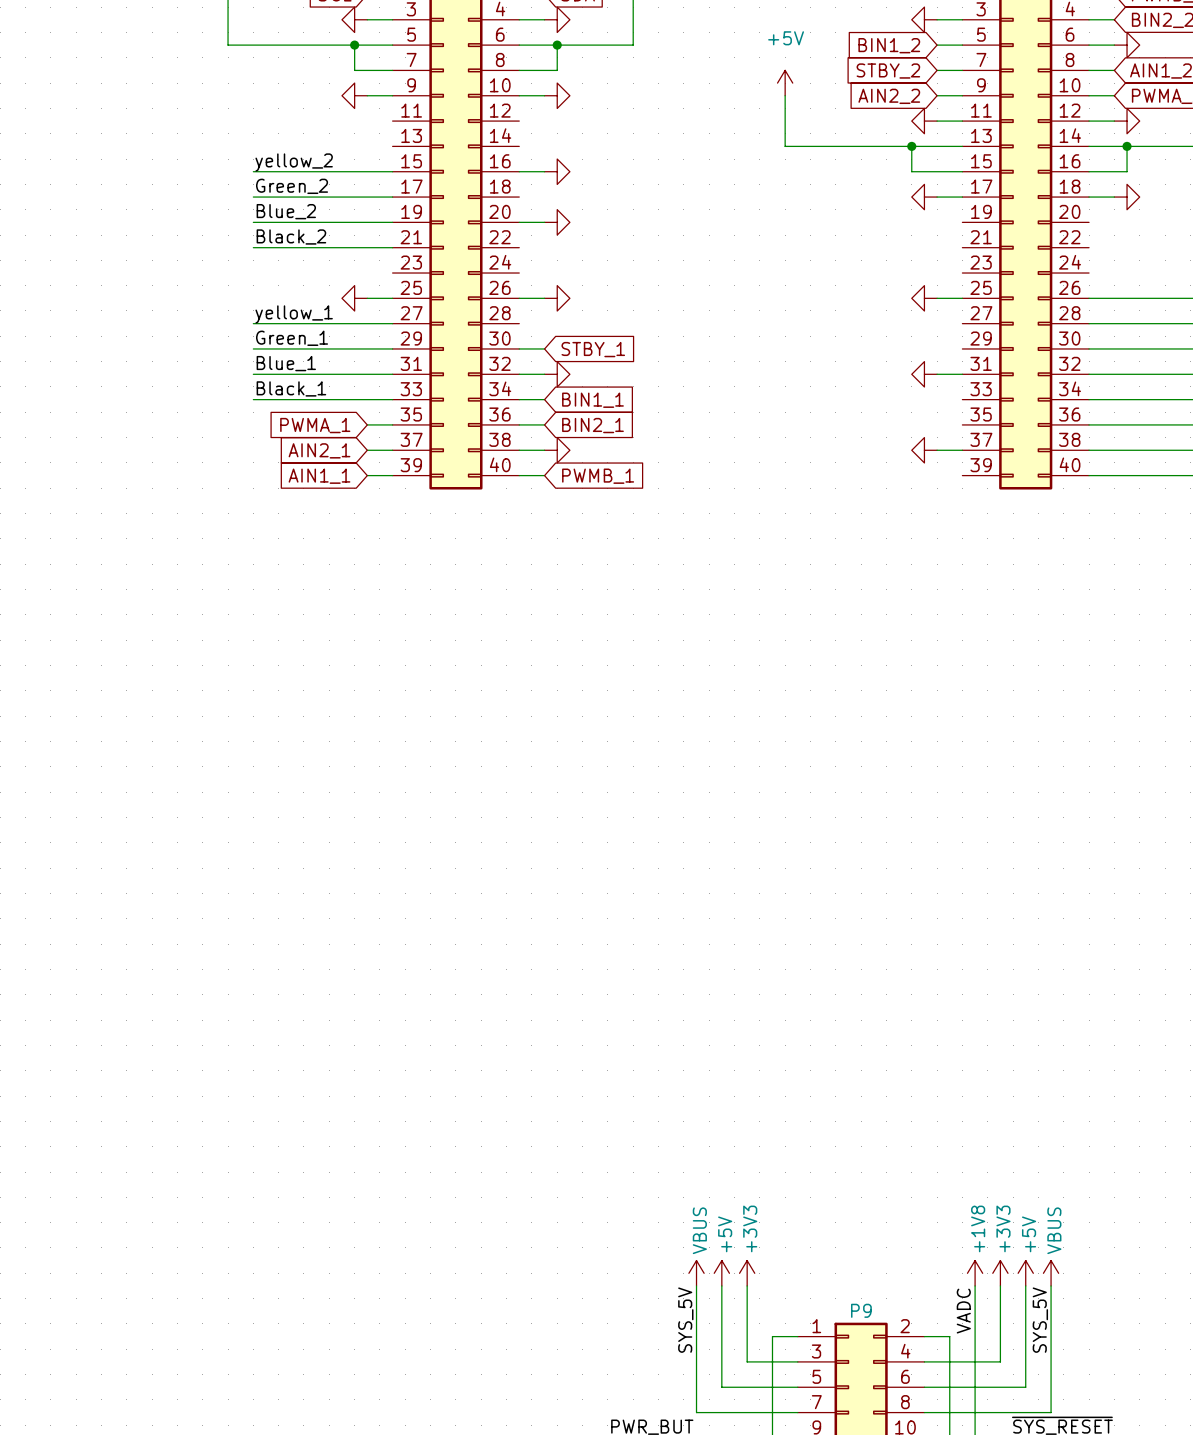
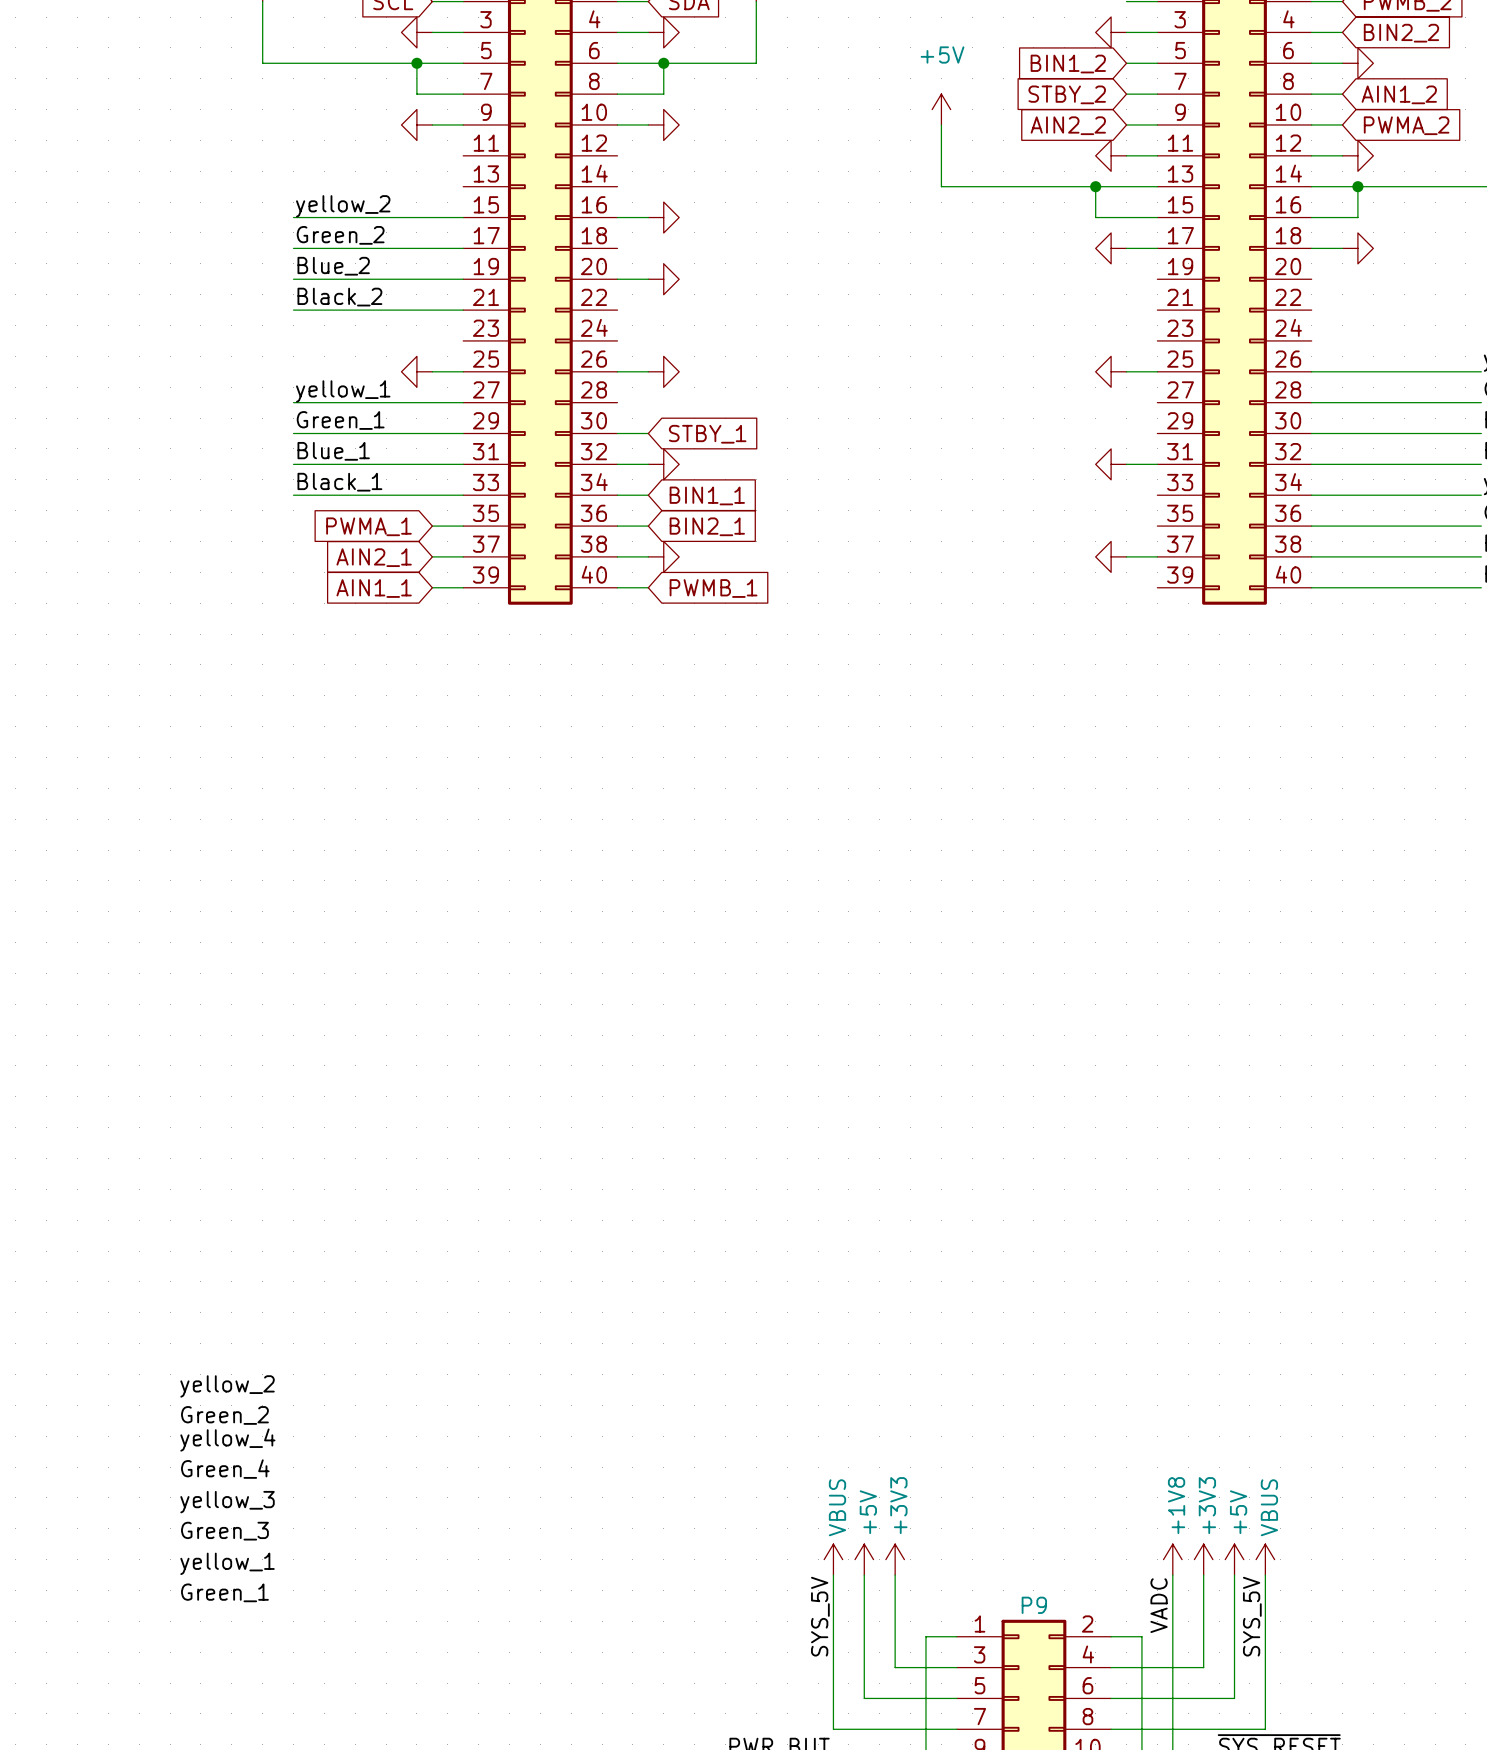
label: none -> yellow_2 (227, 1386)
label: none -> Green_2 (224, 1415)
label: none -> yellow_4 (227, 1440)
label: none -> Green_4 (225, 1469)
label: none -> yellow_3 (227, 1502)
label: none -> Green_3 (224, 1531)
label: none -> yellow_1 (227, 1563)
label: none -> Green_1 (224, 1592)

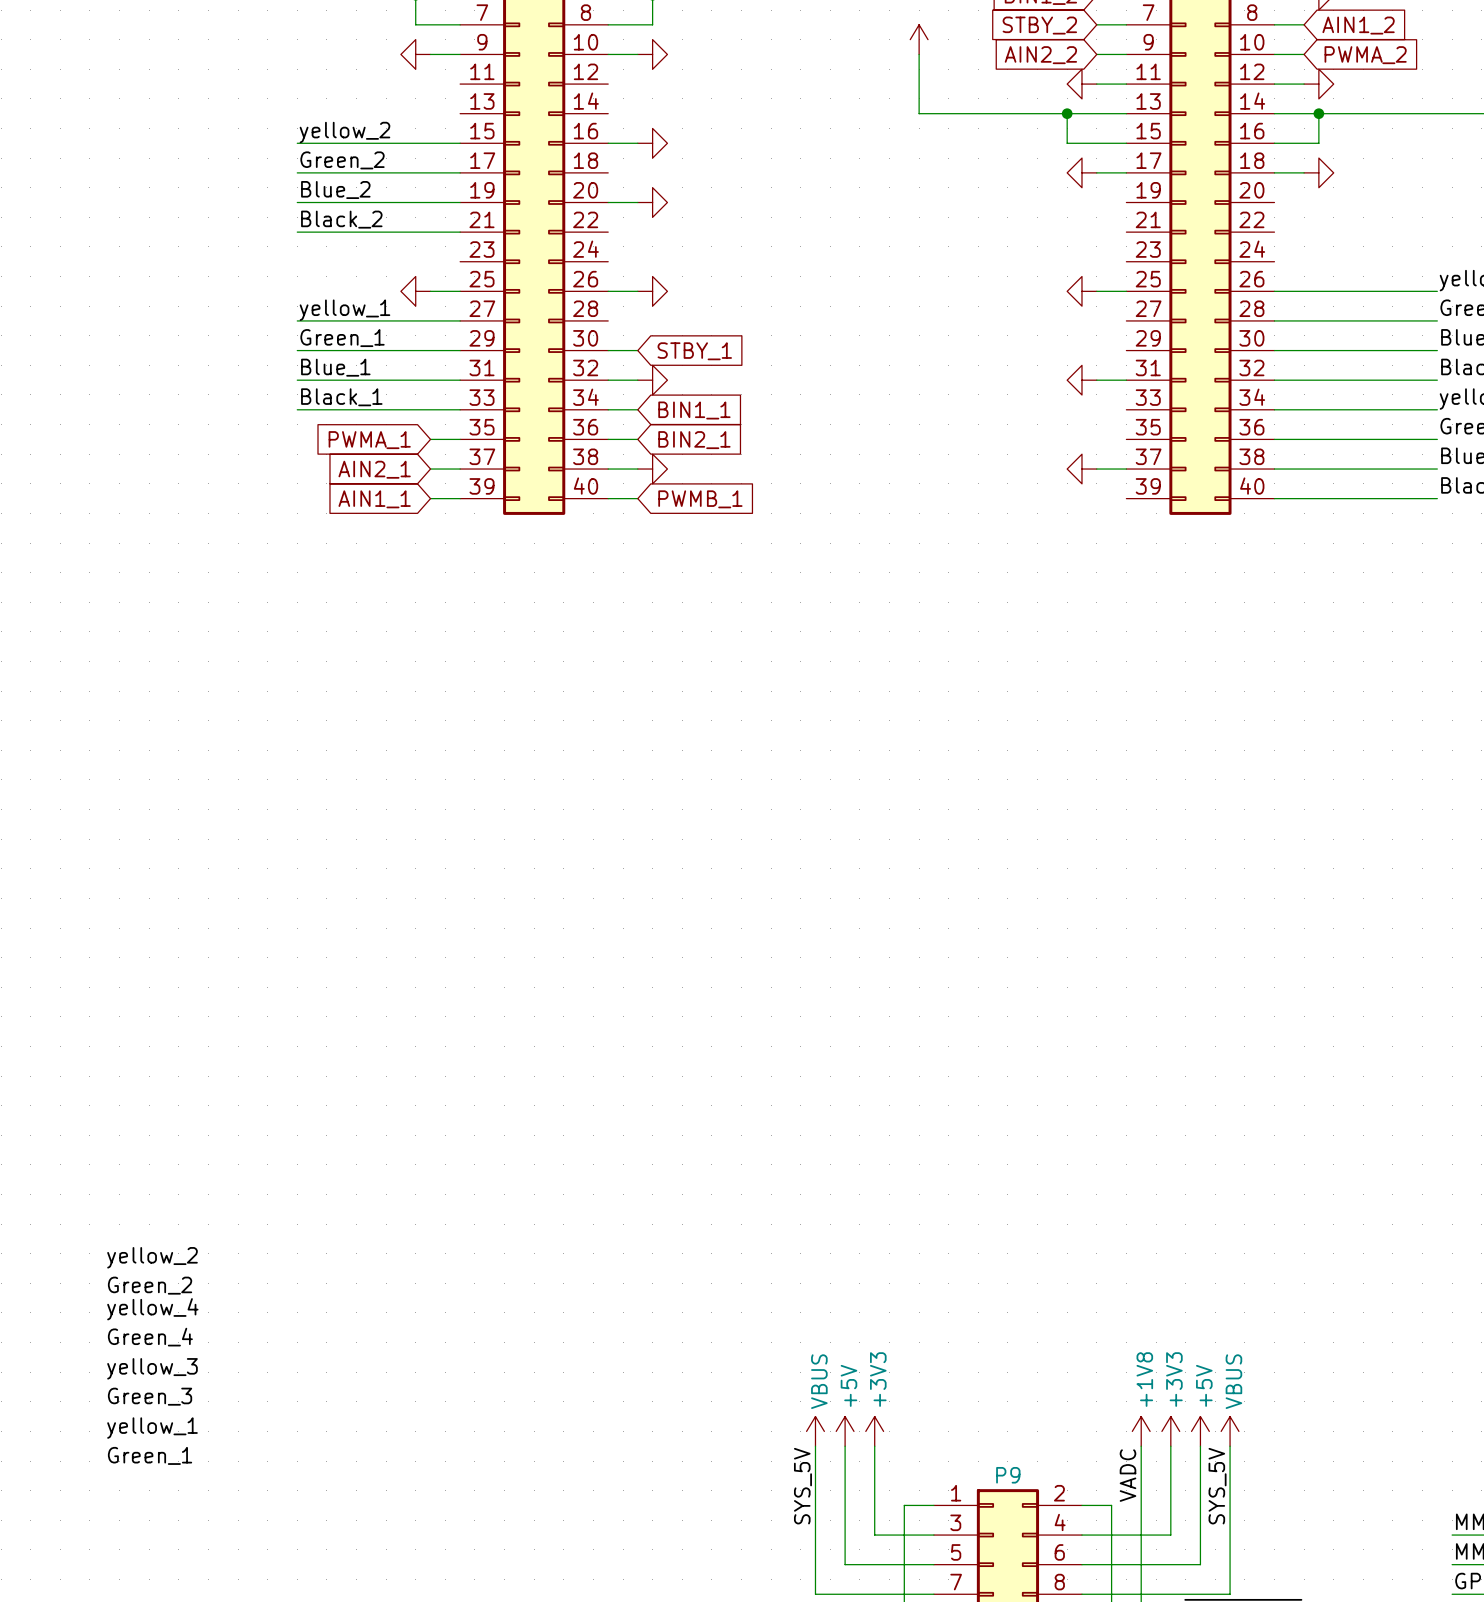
label position: yellow_2 (227, 1386) -> yellow_2 (152, 1257)
label position: Green_2 (224, 1415) -> Green_2 (150, 1285)
label position: yellow_4 (227, 1440) -> yellow_4 (152, 1309)
label position: Green_4 (225, 1469) -> Green_4 (150, 1337)
label position: yellow_3 (227, 1502) -> yellow_3 (152, 1368)
label position: Green_3 (224, 1531) -> Green_3 (150, 1396)
label position: yellow_1 (227, 1563) -> yellow_1 (152, 1428)
label position: Green_1 (224, 1592) -> Green_1 (150, 1455)

